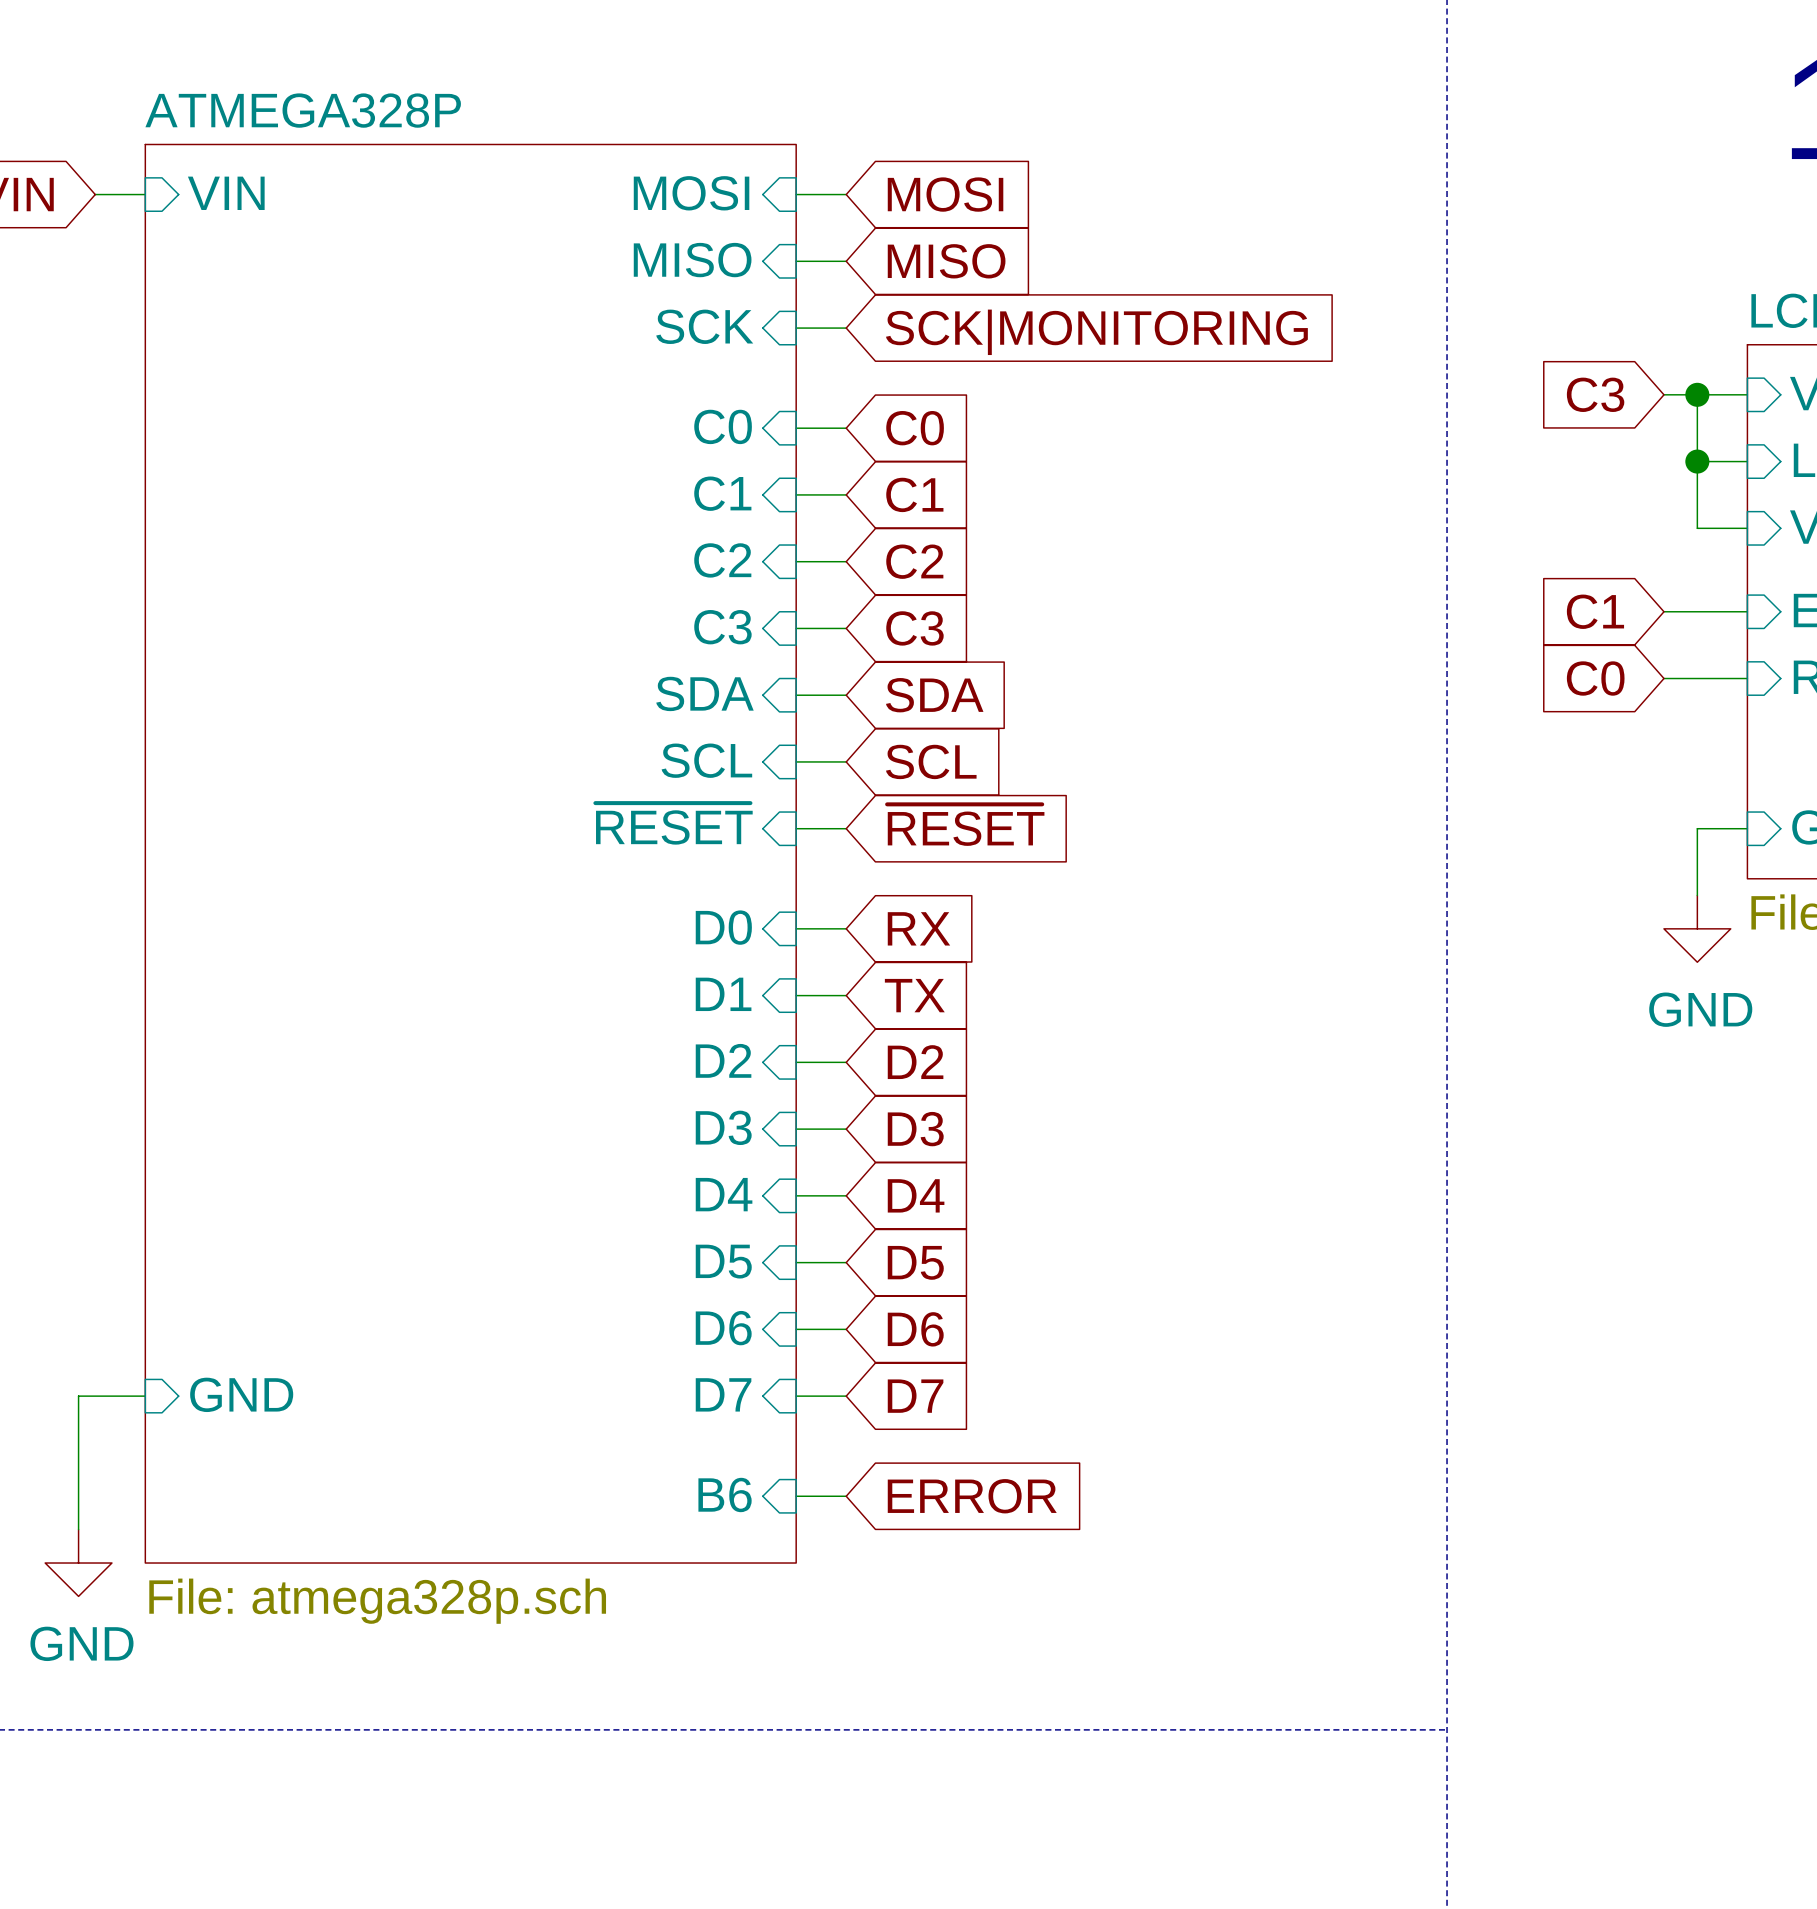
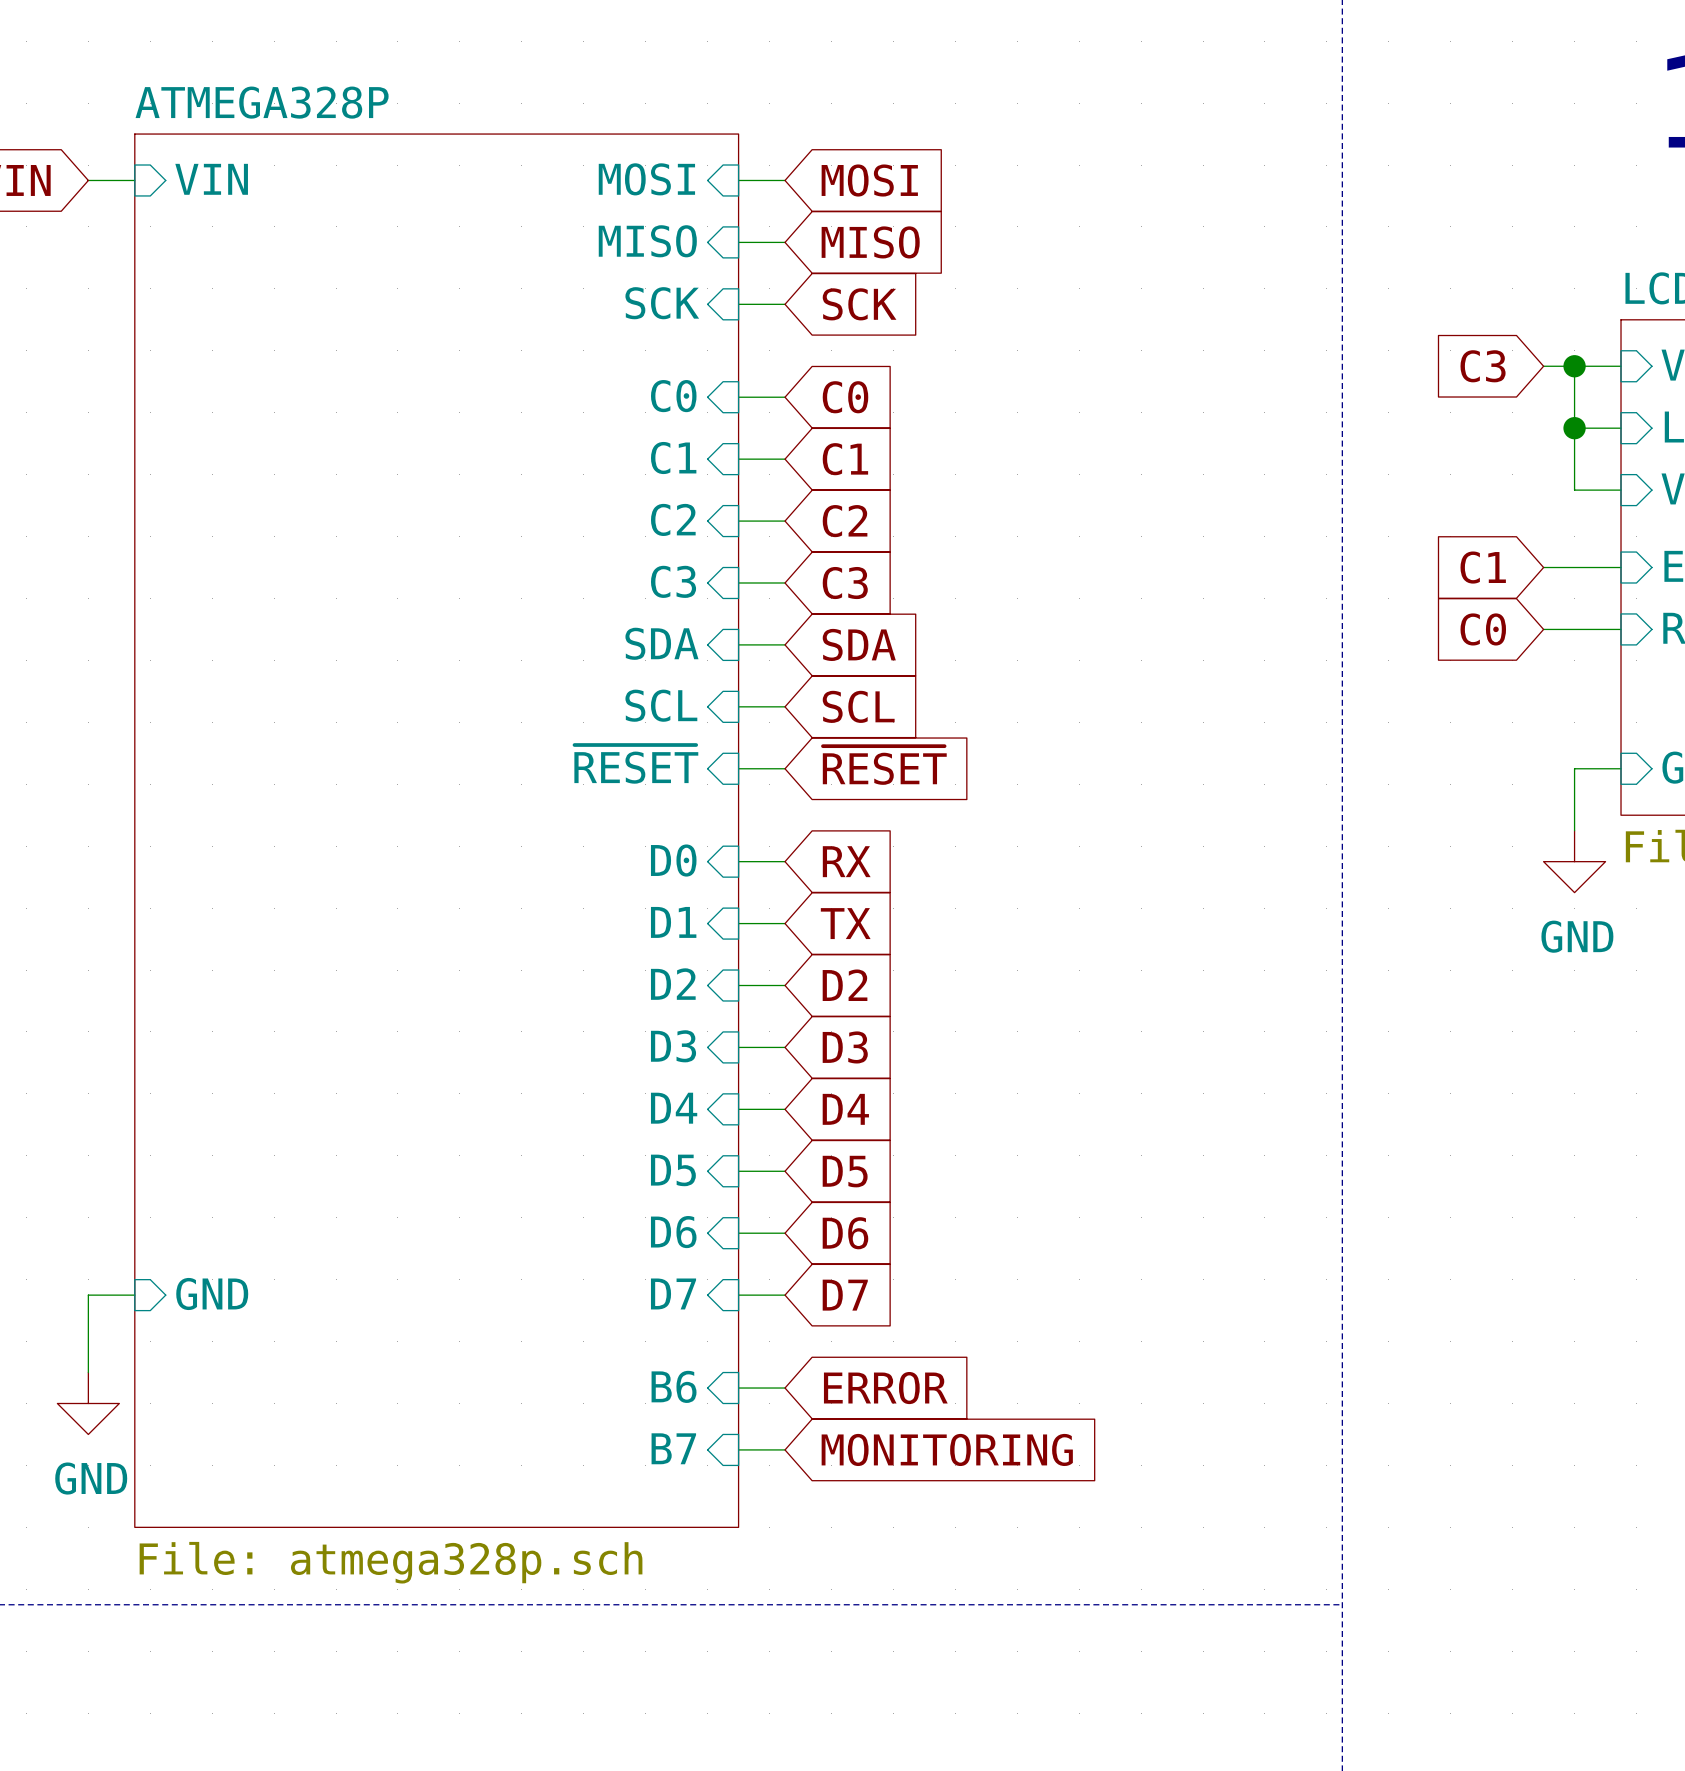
sheet ATMEGA328P shape: [145, 144, 797, 1564] -> [134, 134, 739, 1528]
global label: SCK|MONITORING (1096, 332) -> SCK (859, 304)
wire: (95, 1396) (78, 1396) (78, 1529) -> (88, 1295) (88, 1372)
sheet pin: none -> B7 (673, 1448)
power symbol position: GND (78, 1563) -> GND (88, 1403)
wire: none -> (738, 1449) (785, 1449)
global label: none -> MONITORING (947, 1449)

